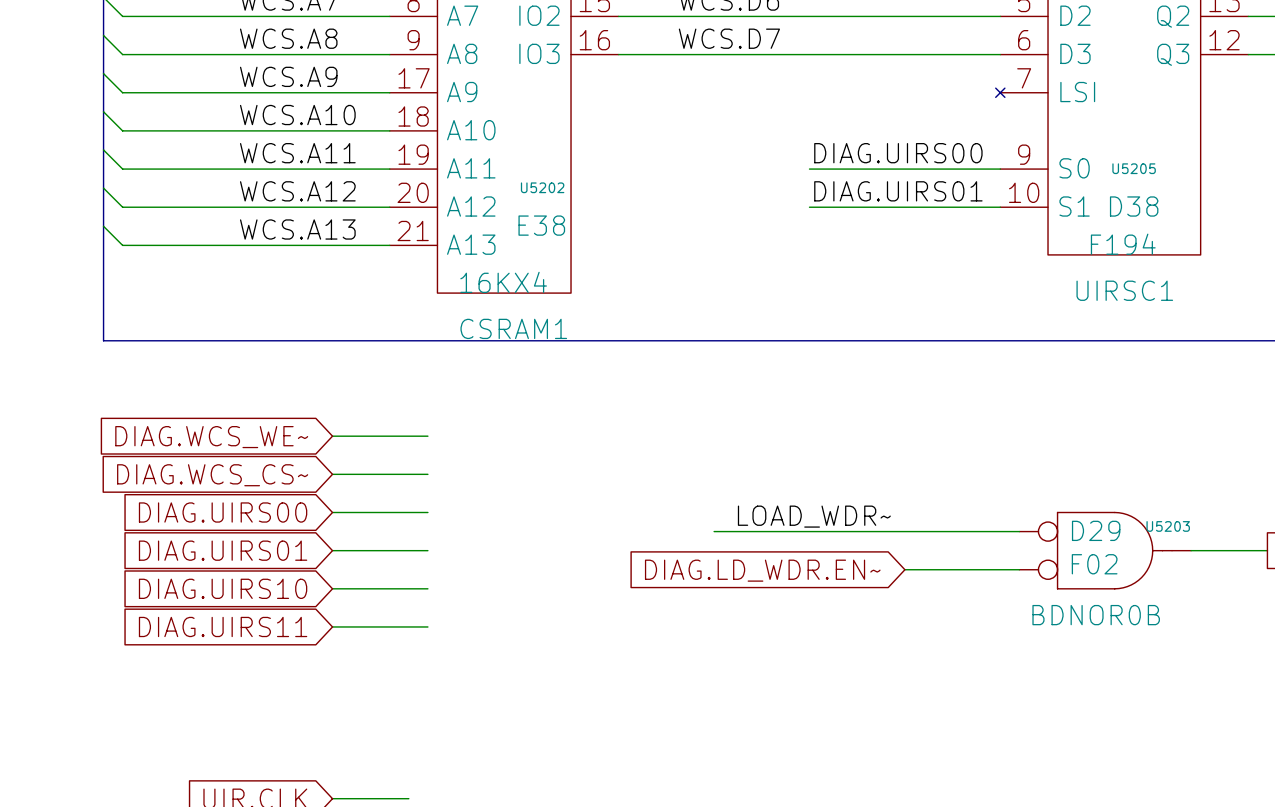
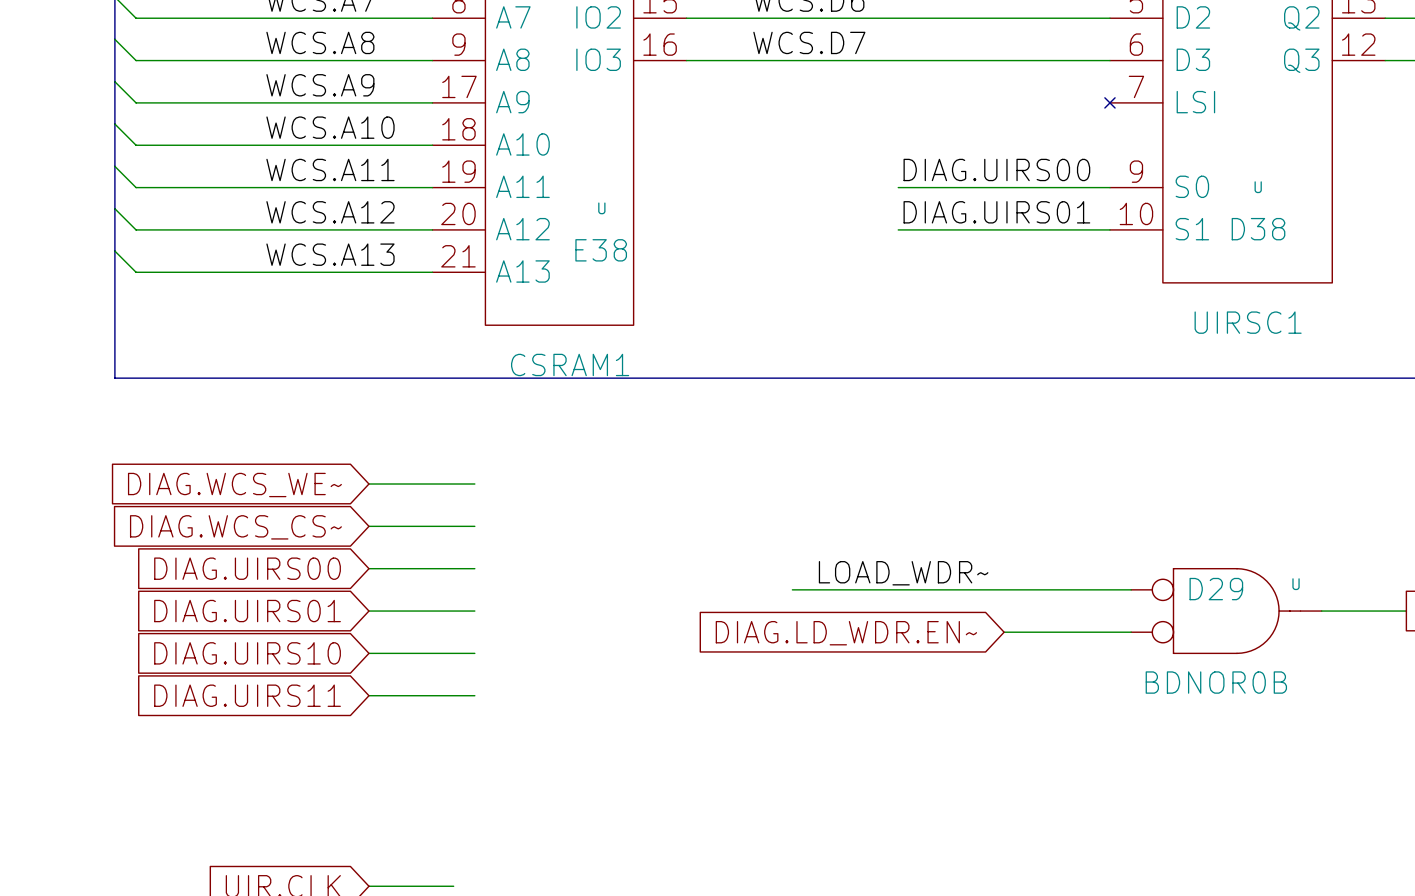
U5205 name: U5205 (1134, 168) -> U (1258, 187)
U5202 name: U5202 (542, 187) -> U (601, 208)
U5205 value: F194 (1123, 244) -> none
U5202 value: 16KX4 (503, 282) -> none
U5203 name: U5203 (1168, 526) -> U (1296, 584)
U5203 value: F02 (1094, 564) -> none

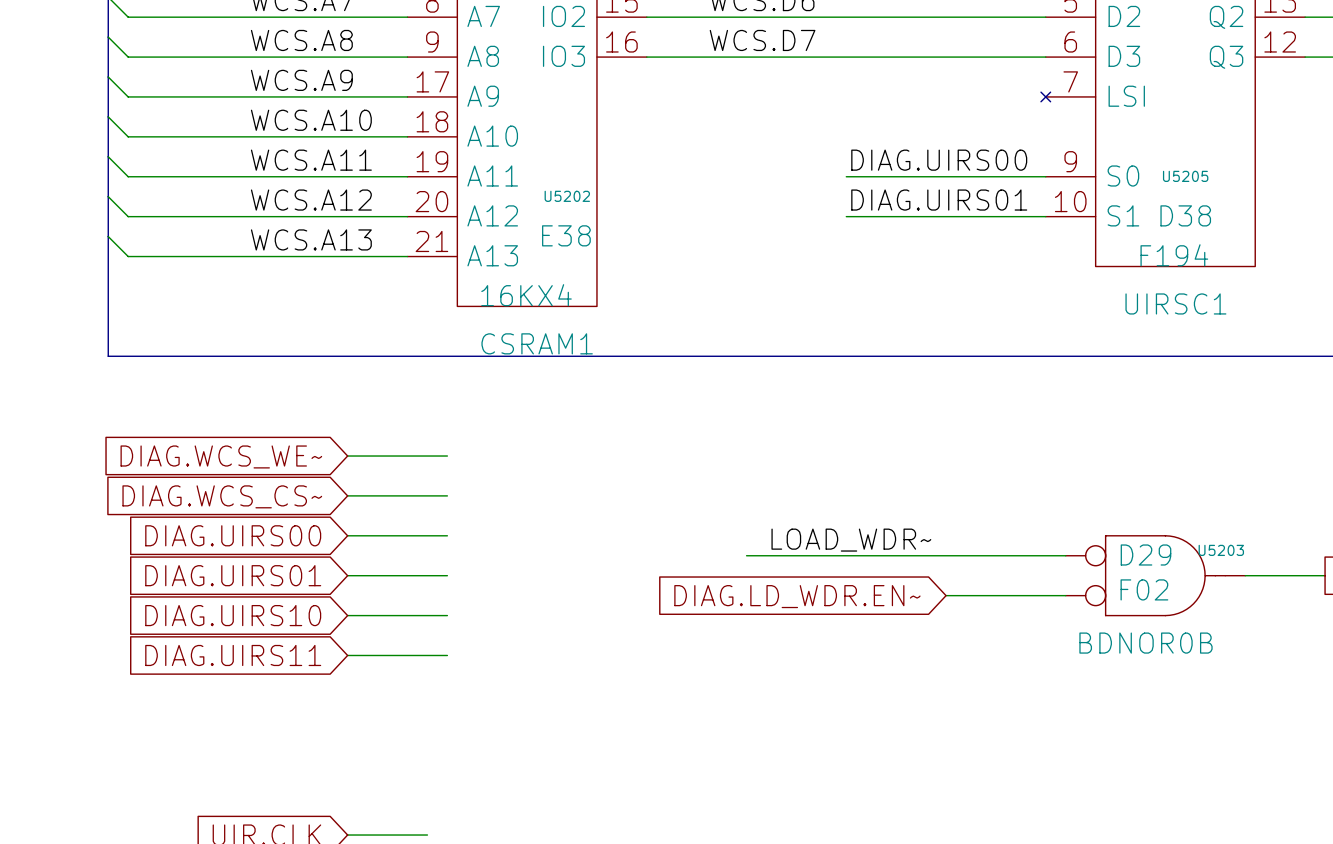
U name: U (1258, 187) -> U5205 (1185, 176)
U name: U (601, 208) -> U5202 (567, 196)
U value: none -> F194 (1174, 255)
U value: none -> 16KX4 (526, 295)
U name: U (1296, 584) -> U5203 (1221, 550)
U value: none -> F02 (1144, 589)

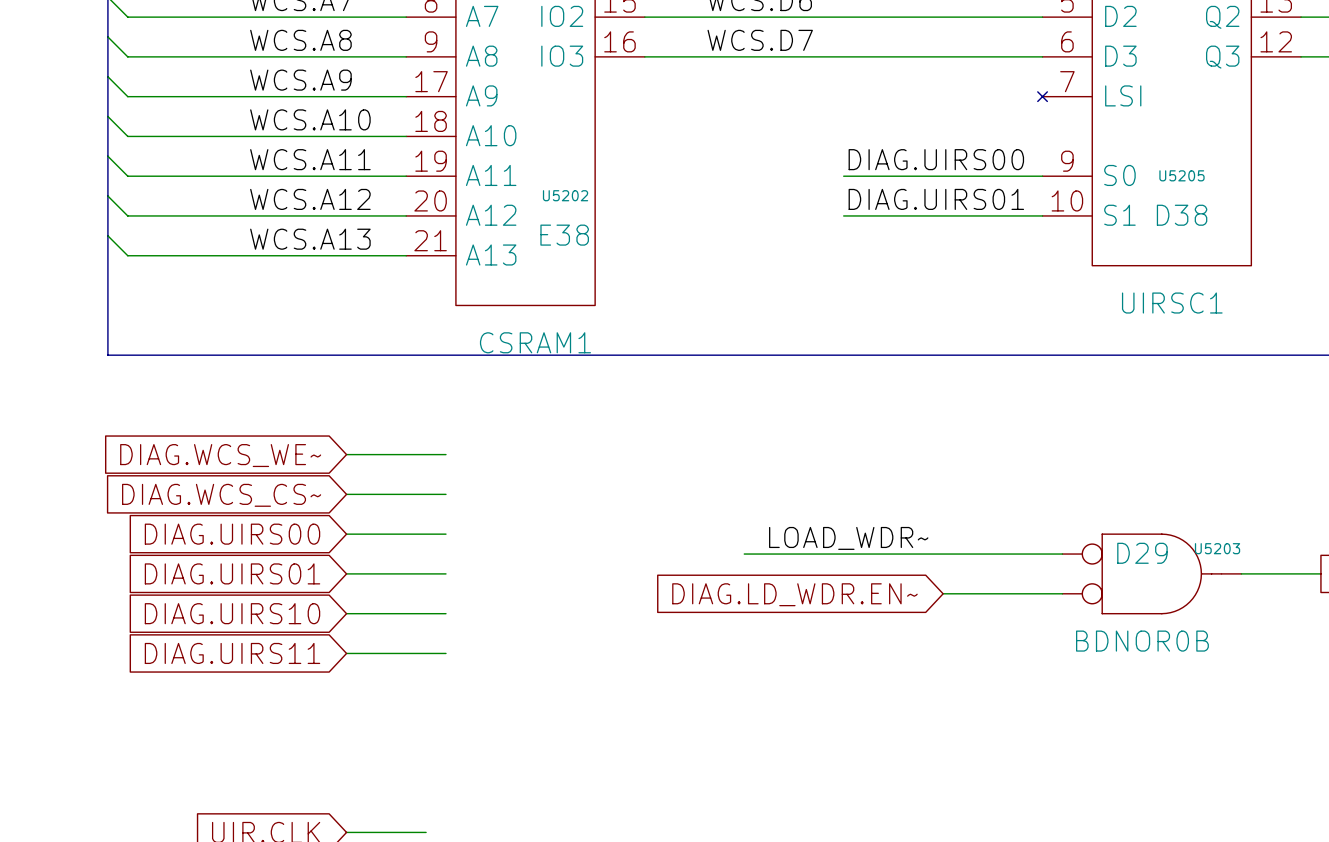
U5205 value: F194 (1174, 255) -> none
U5202 value: 16KX4 (526, 295) -> none
U5203 value: F02 (1144, 589) -> none

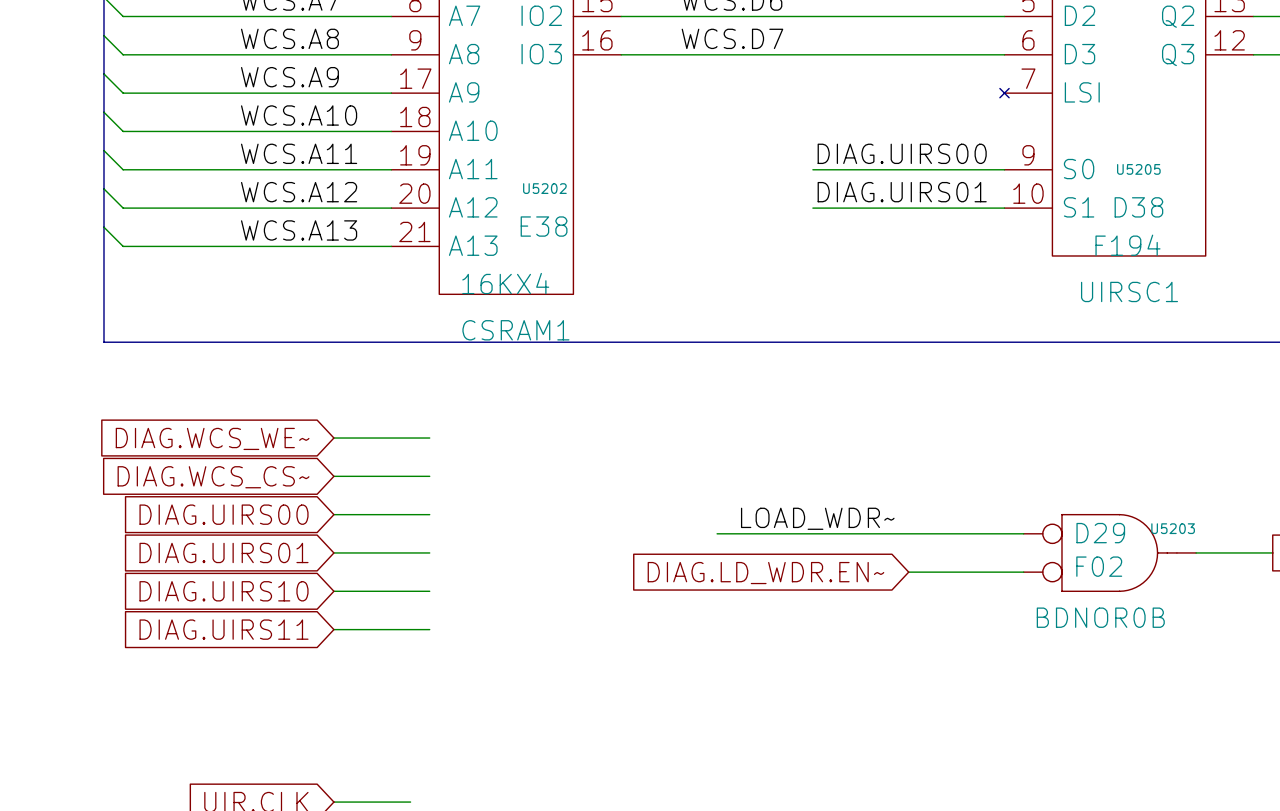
U5205 value: none -> F194 (1127, 245)
U5202 value: none -> 16KX4 (505, 283)
U5203 value: none -> F02 (1099, 566)

